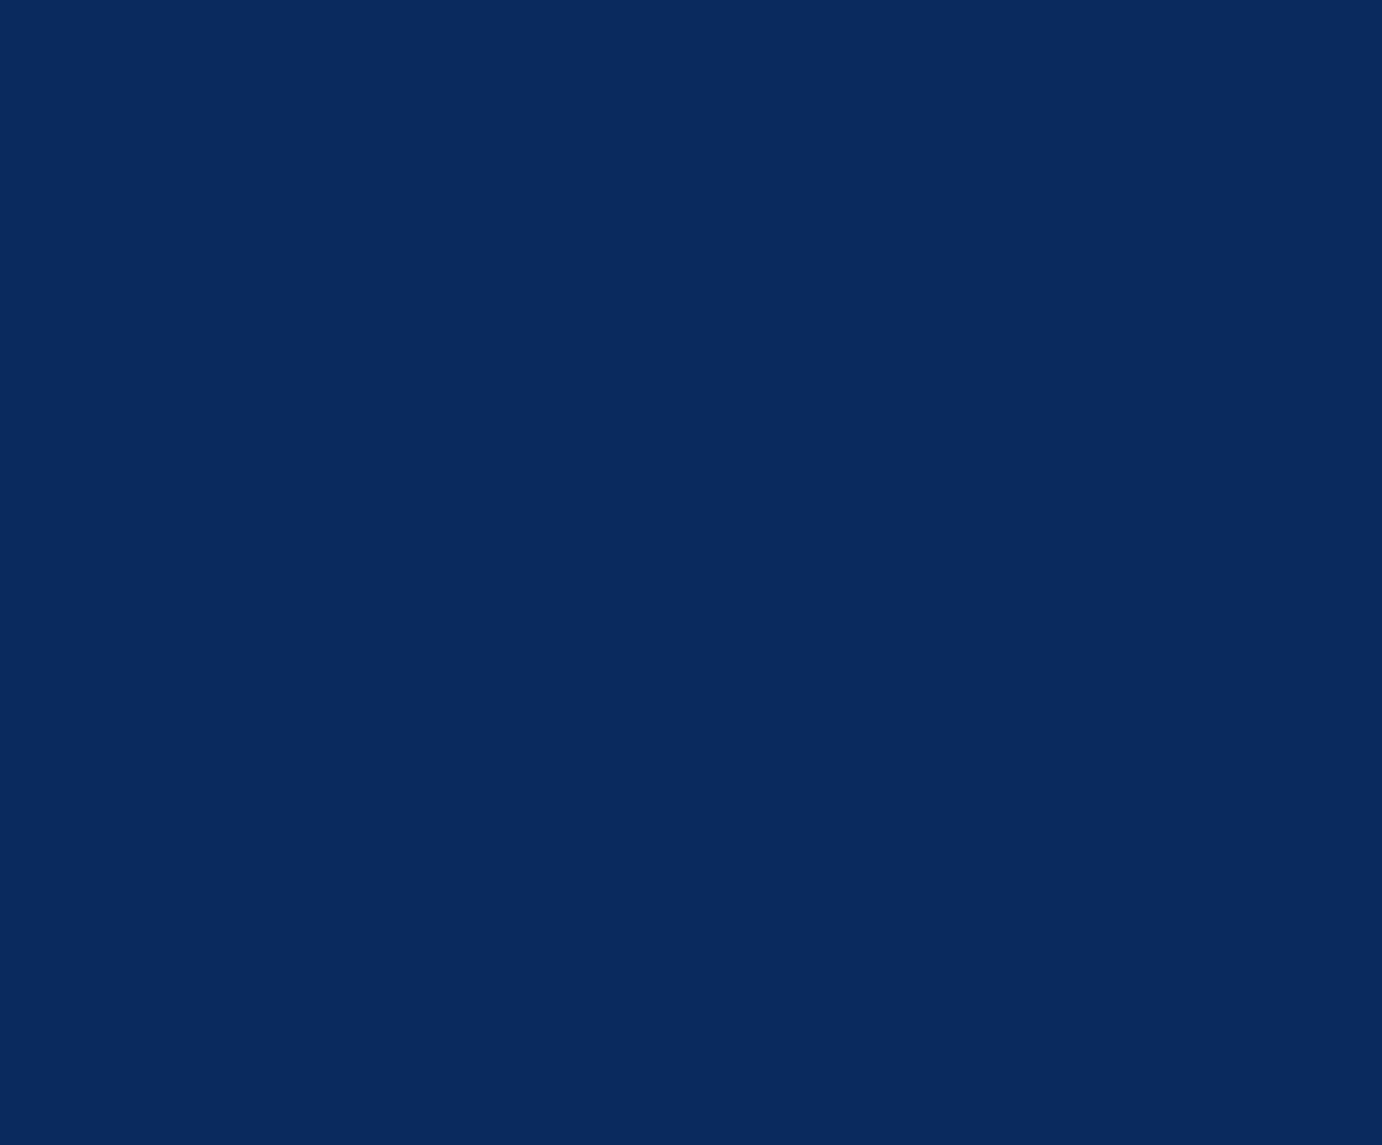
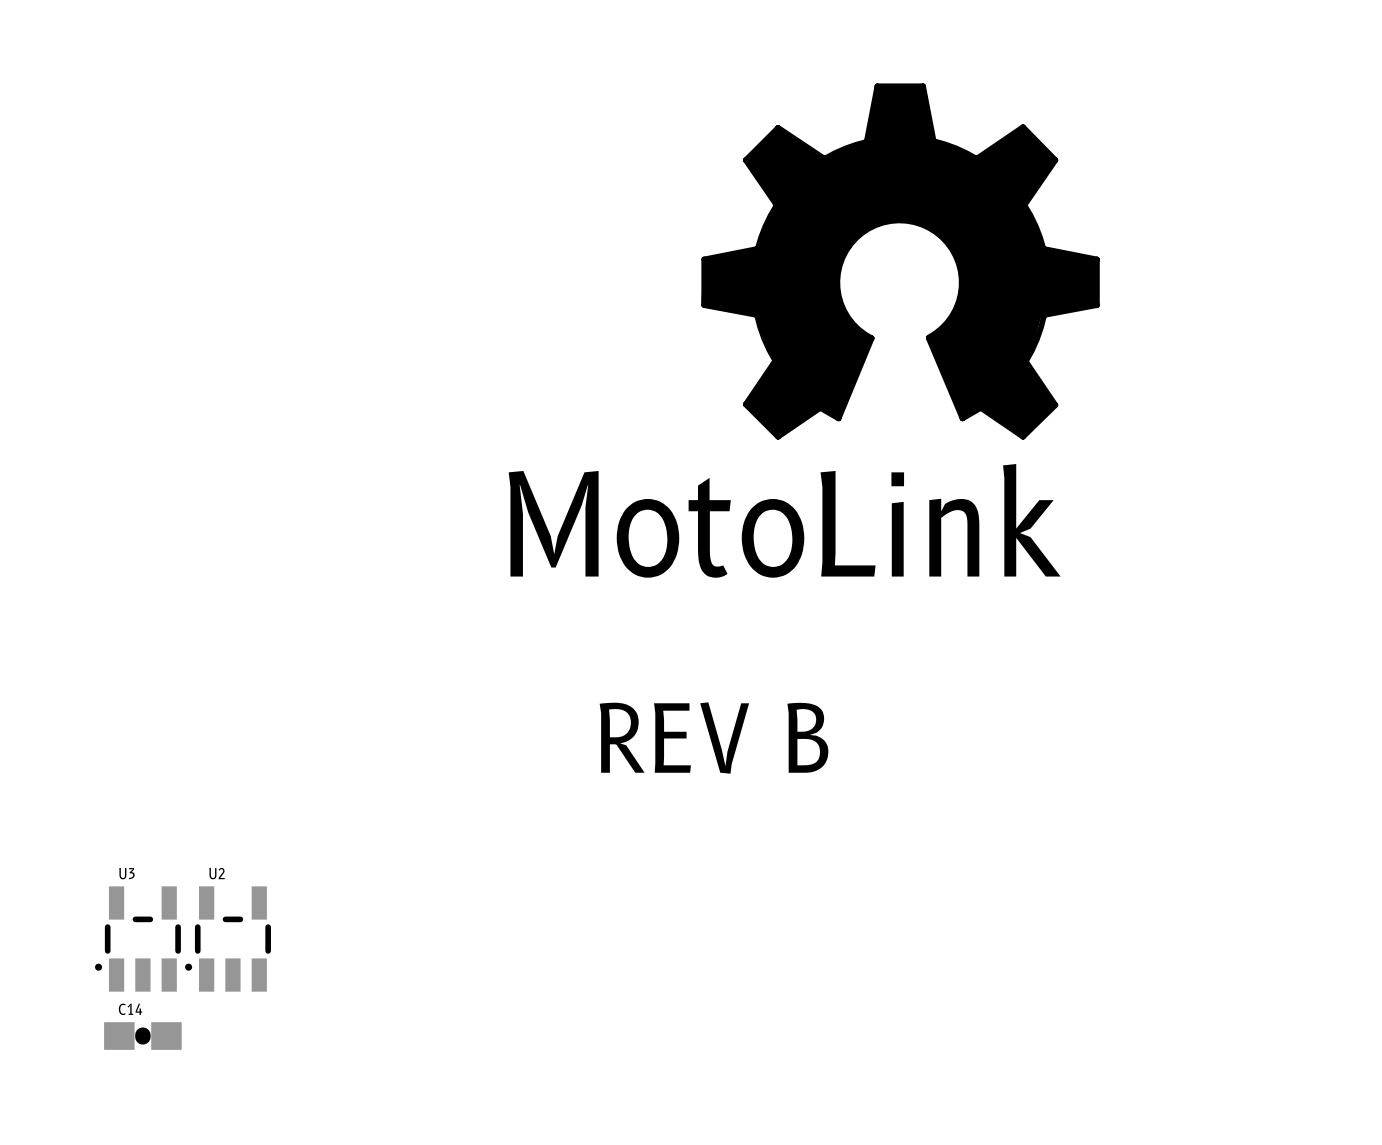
drawing: none -> [701, 83, 1100, 440]
text: none -> MotoLink (784, 520)
text: none -> REV B (714, 738)
U3: none -> (137, 939)
U2: none -> (228, 939)
C14: none -> (142, 1036)

